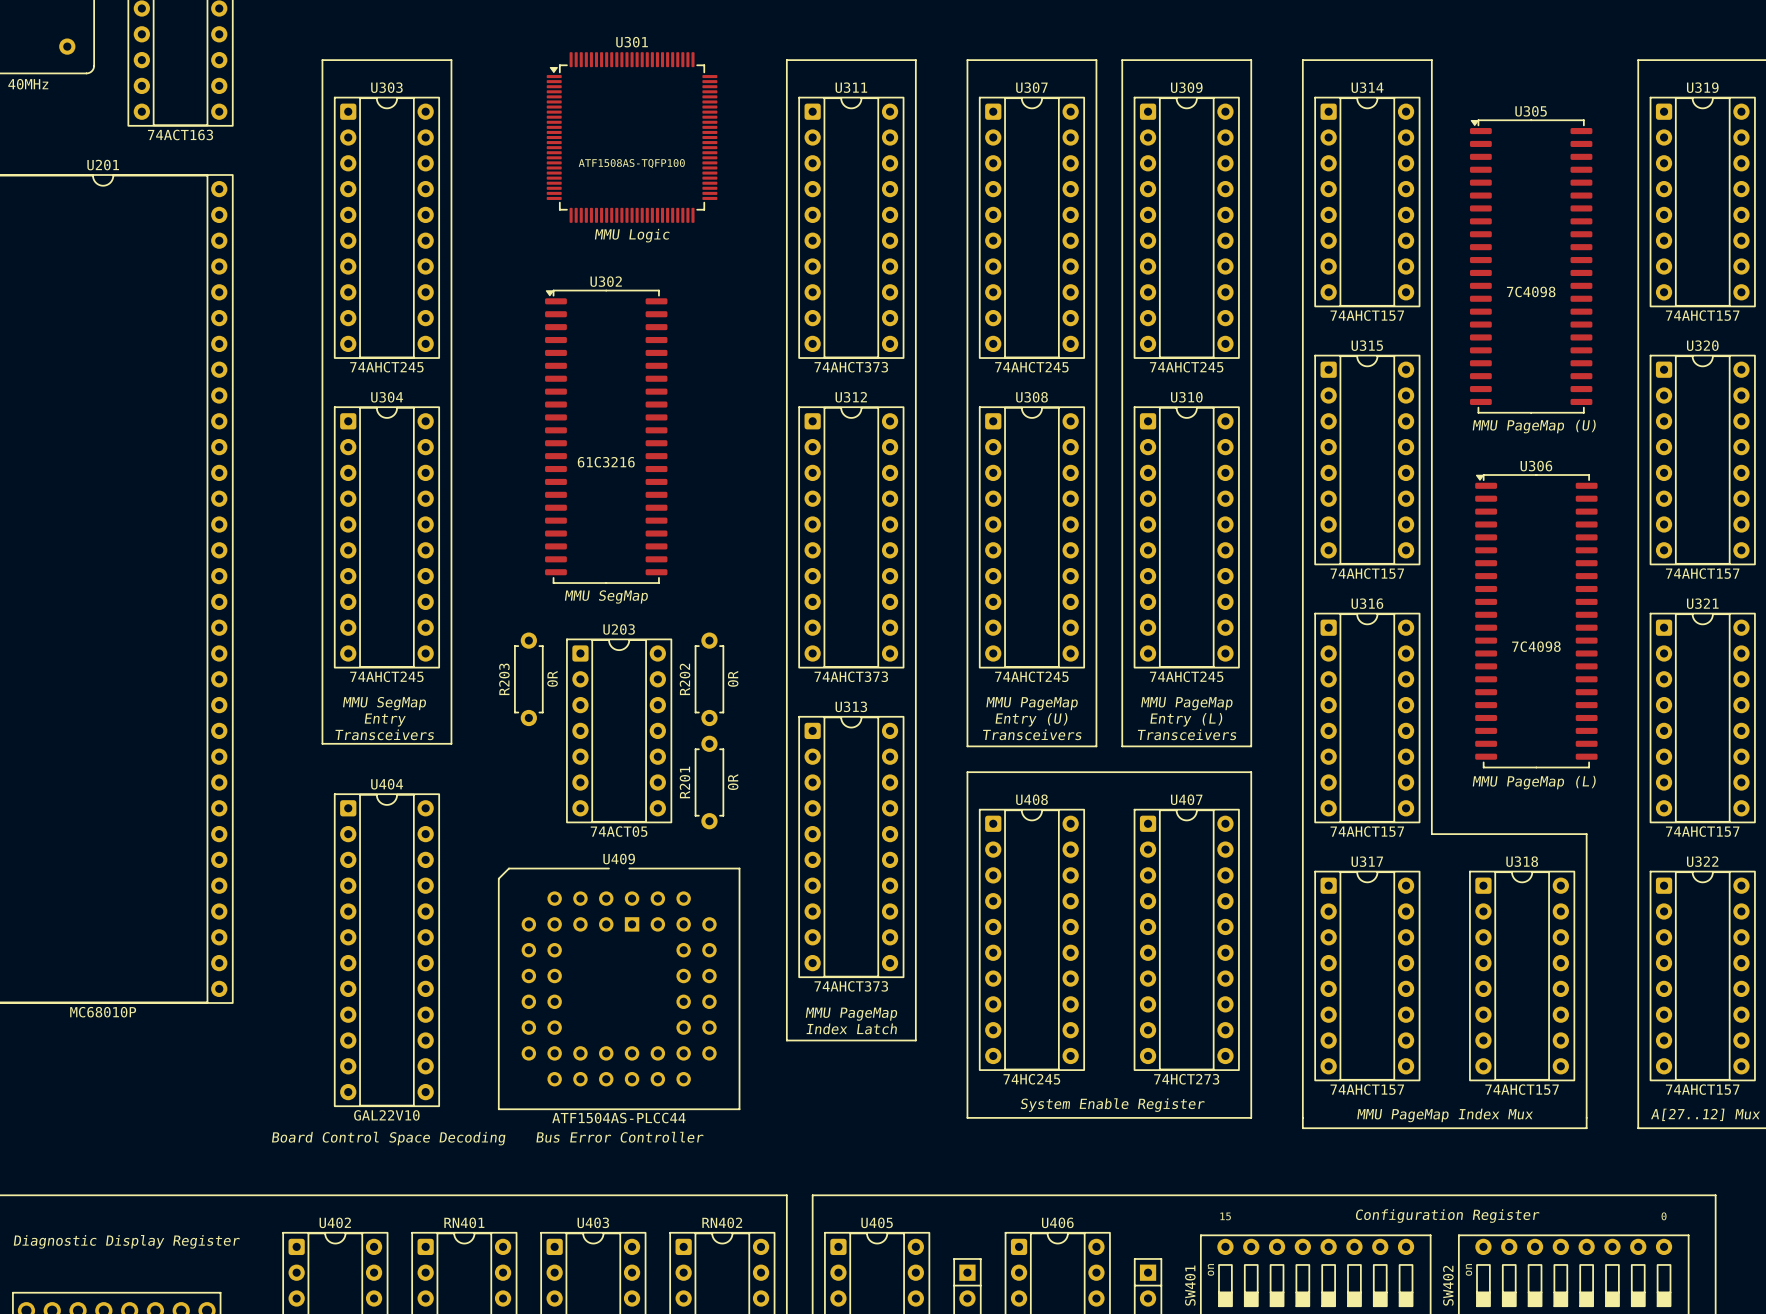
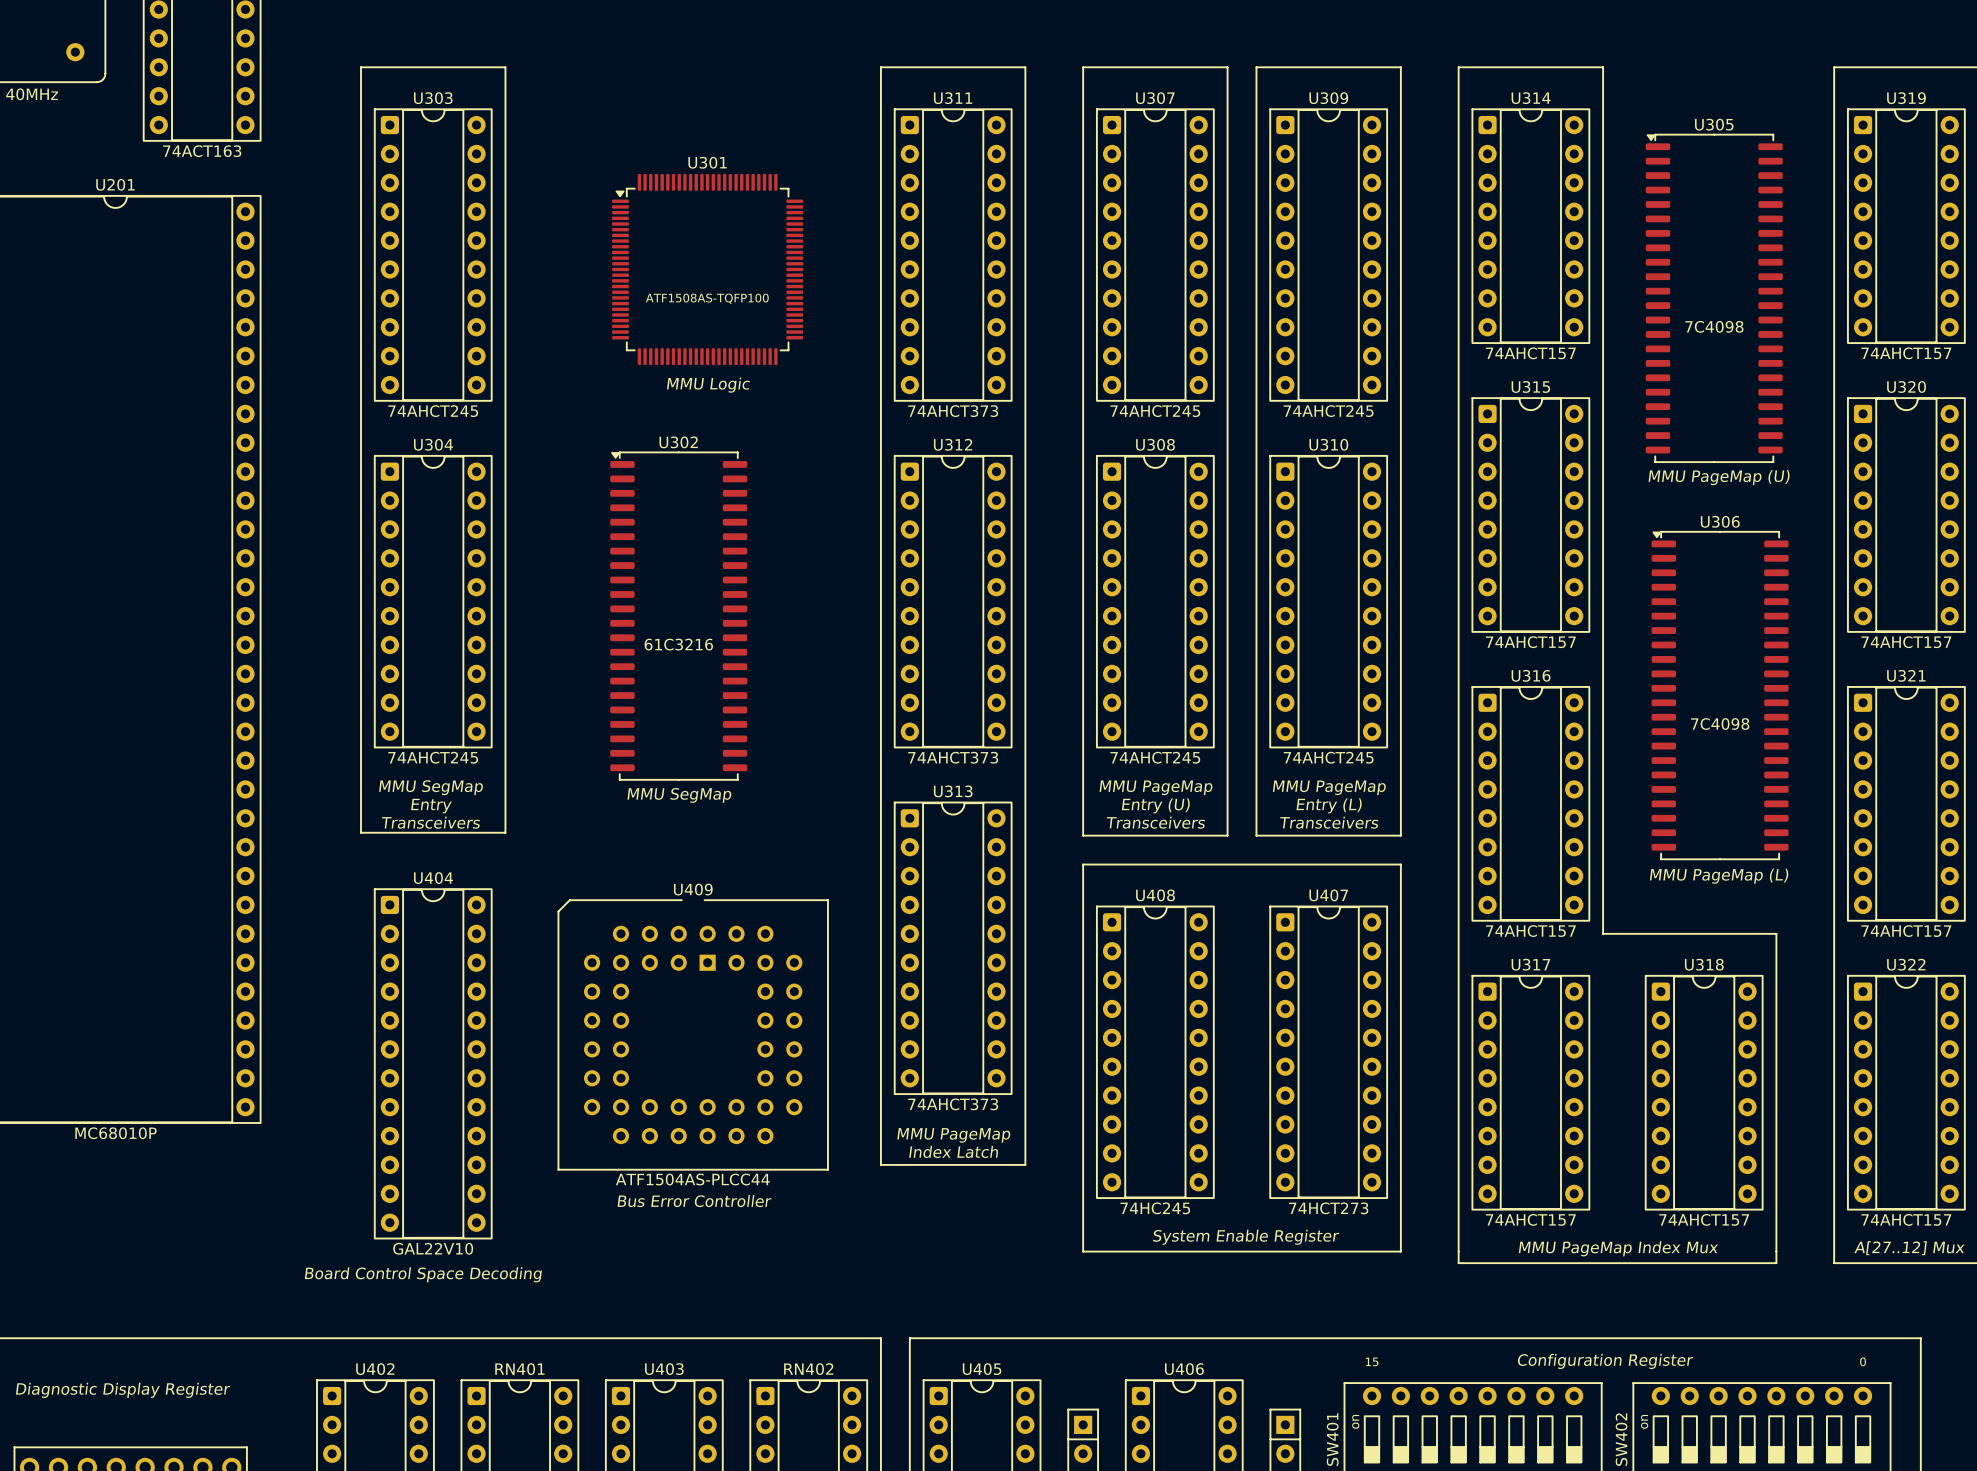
U301 position: (632, 137) -> (707, 269)
text position: MMU Logic (632, 235) -> MMU Logic (708, 385)
U302 position: (606, 436) -> (678, 616)
text position: MMU SegMap (606, 596) -> MMU SegMap (679, 795)
R203: 0R (528, 679) -> none
R202: 0R (709, 679) -> none
U203: 74ACT05 (619, 730) -> none
R201: 0R (709, 782) -> none
U409 position: (619, 988) -> (693, 1034)
text position: Bus Error Controller (619, 1137) -> Bus Error Controller (694, 1201)

